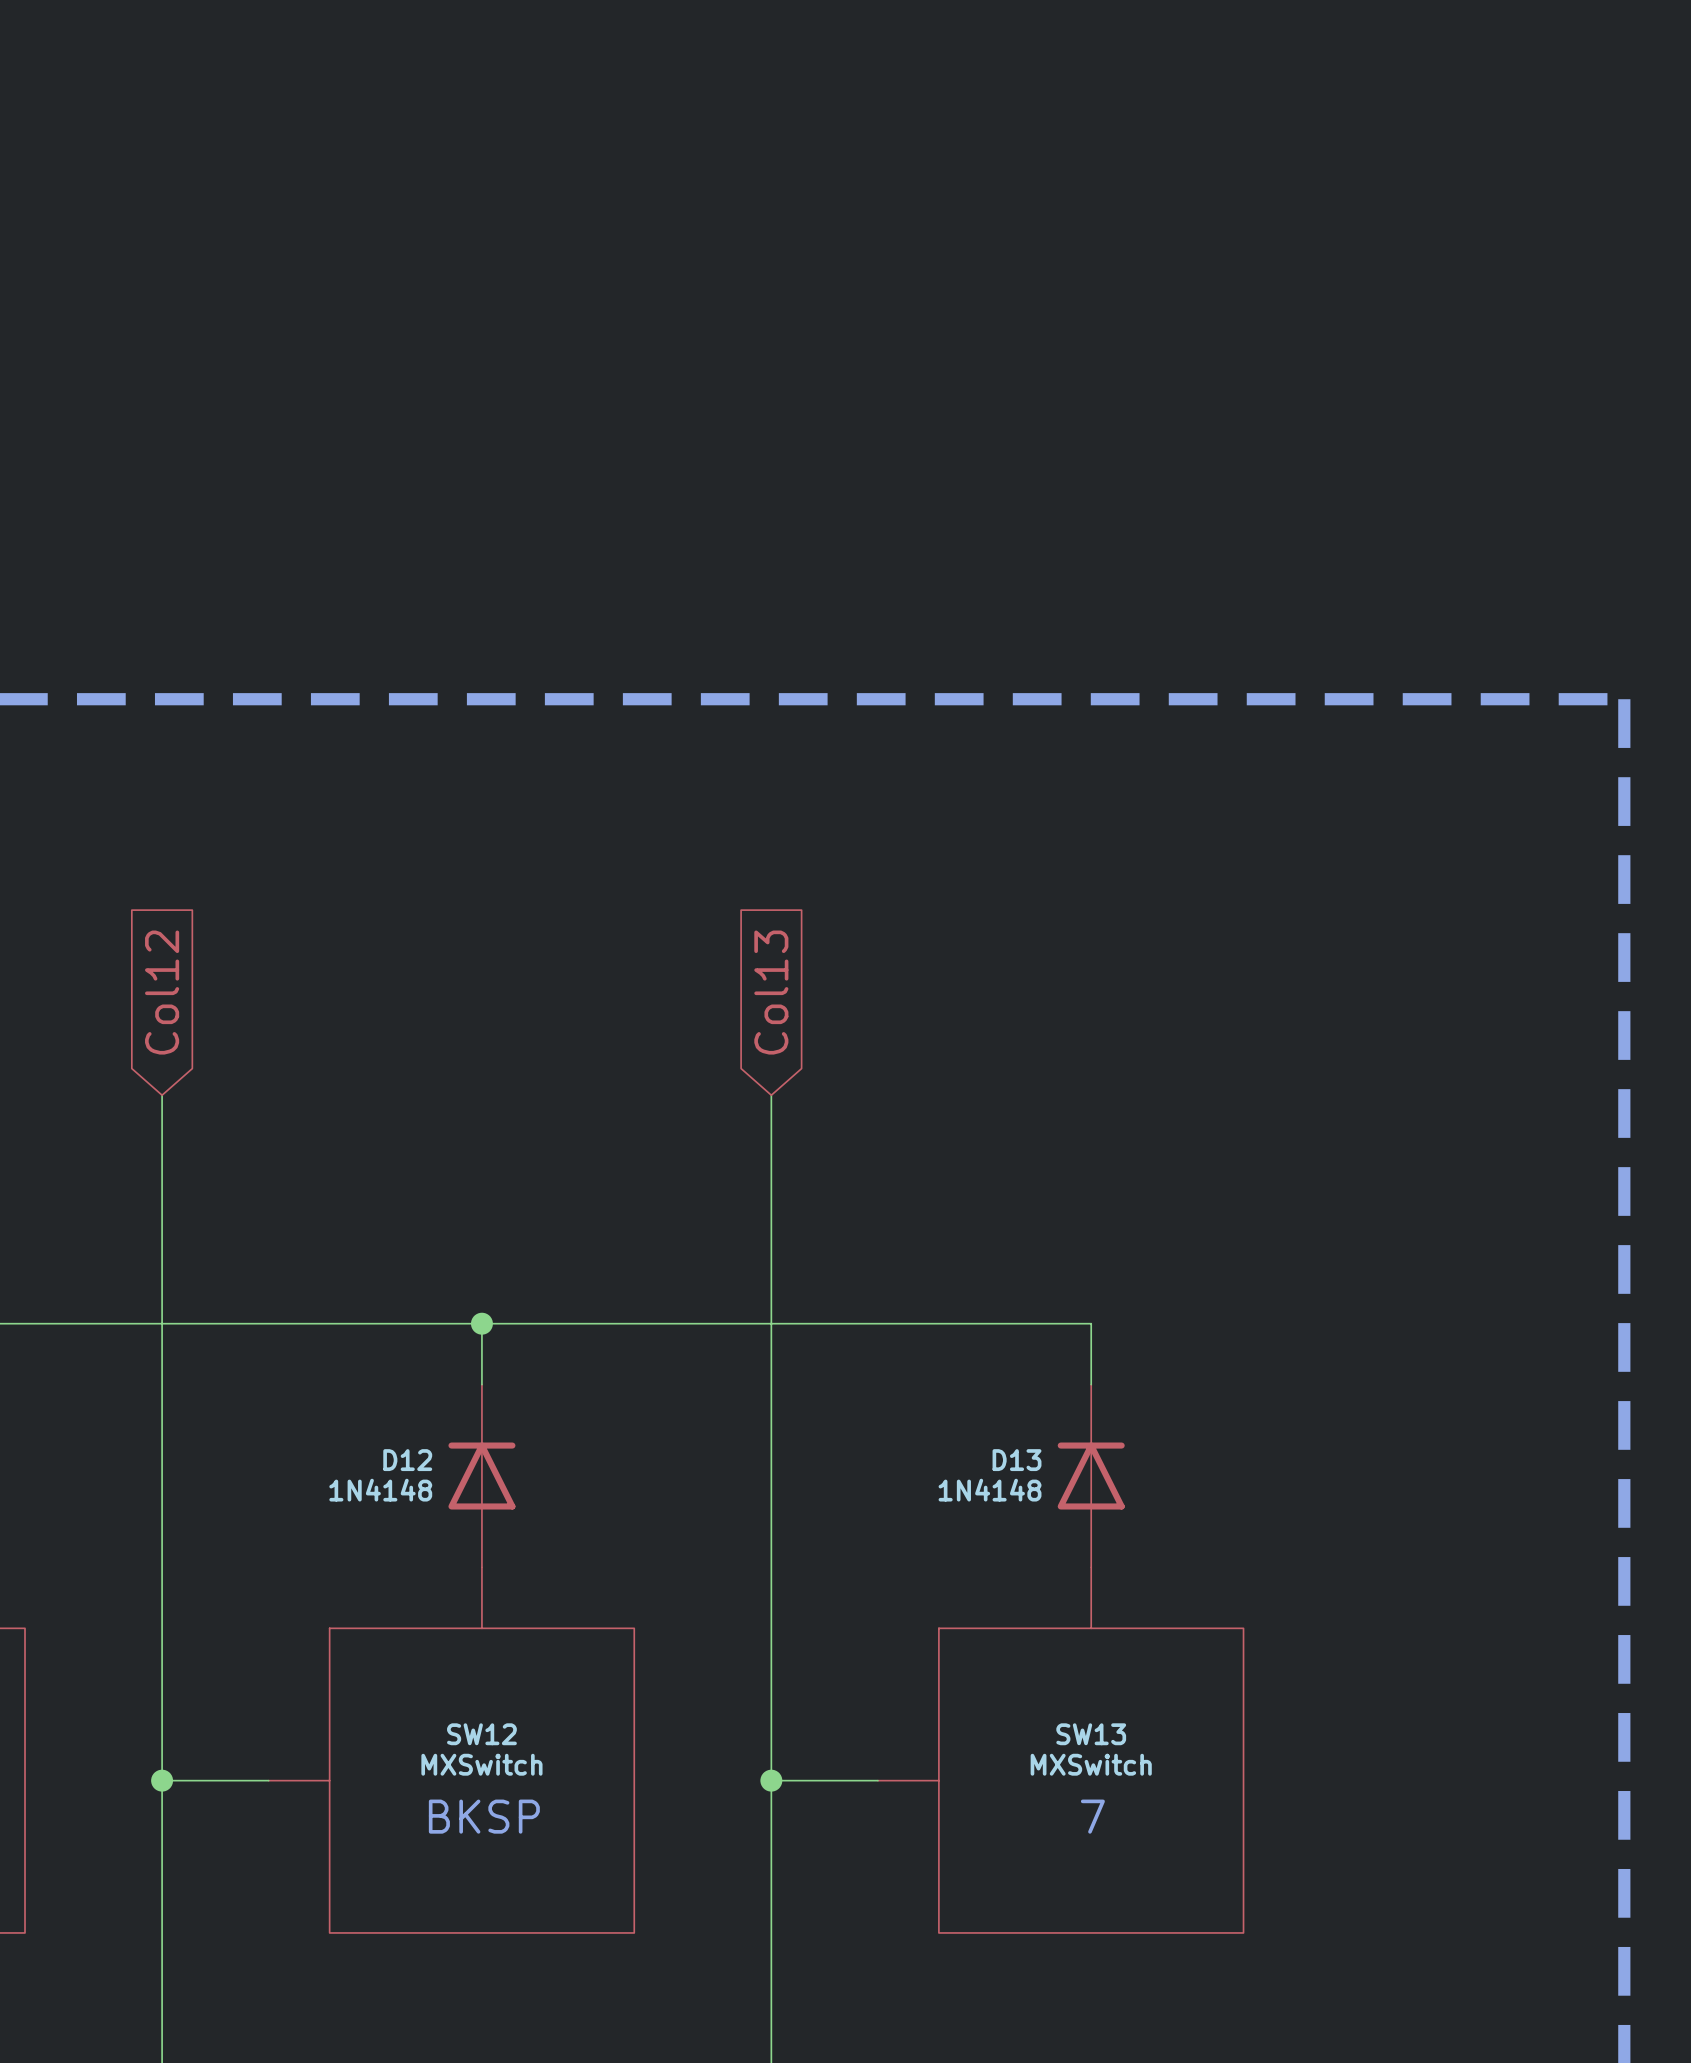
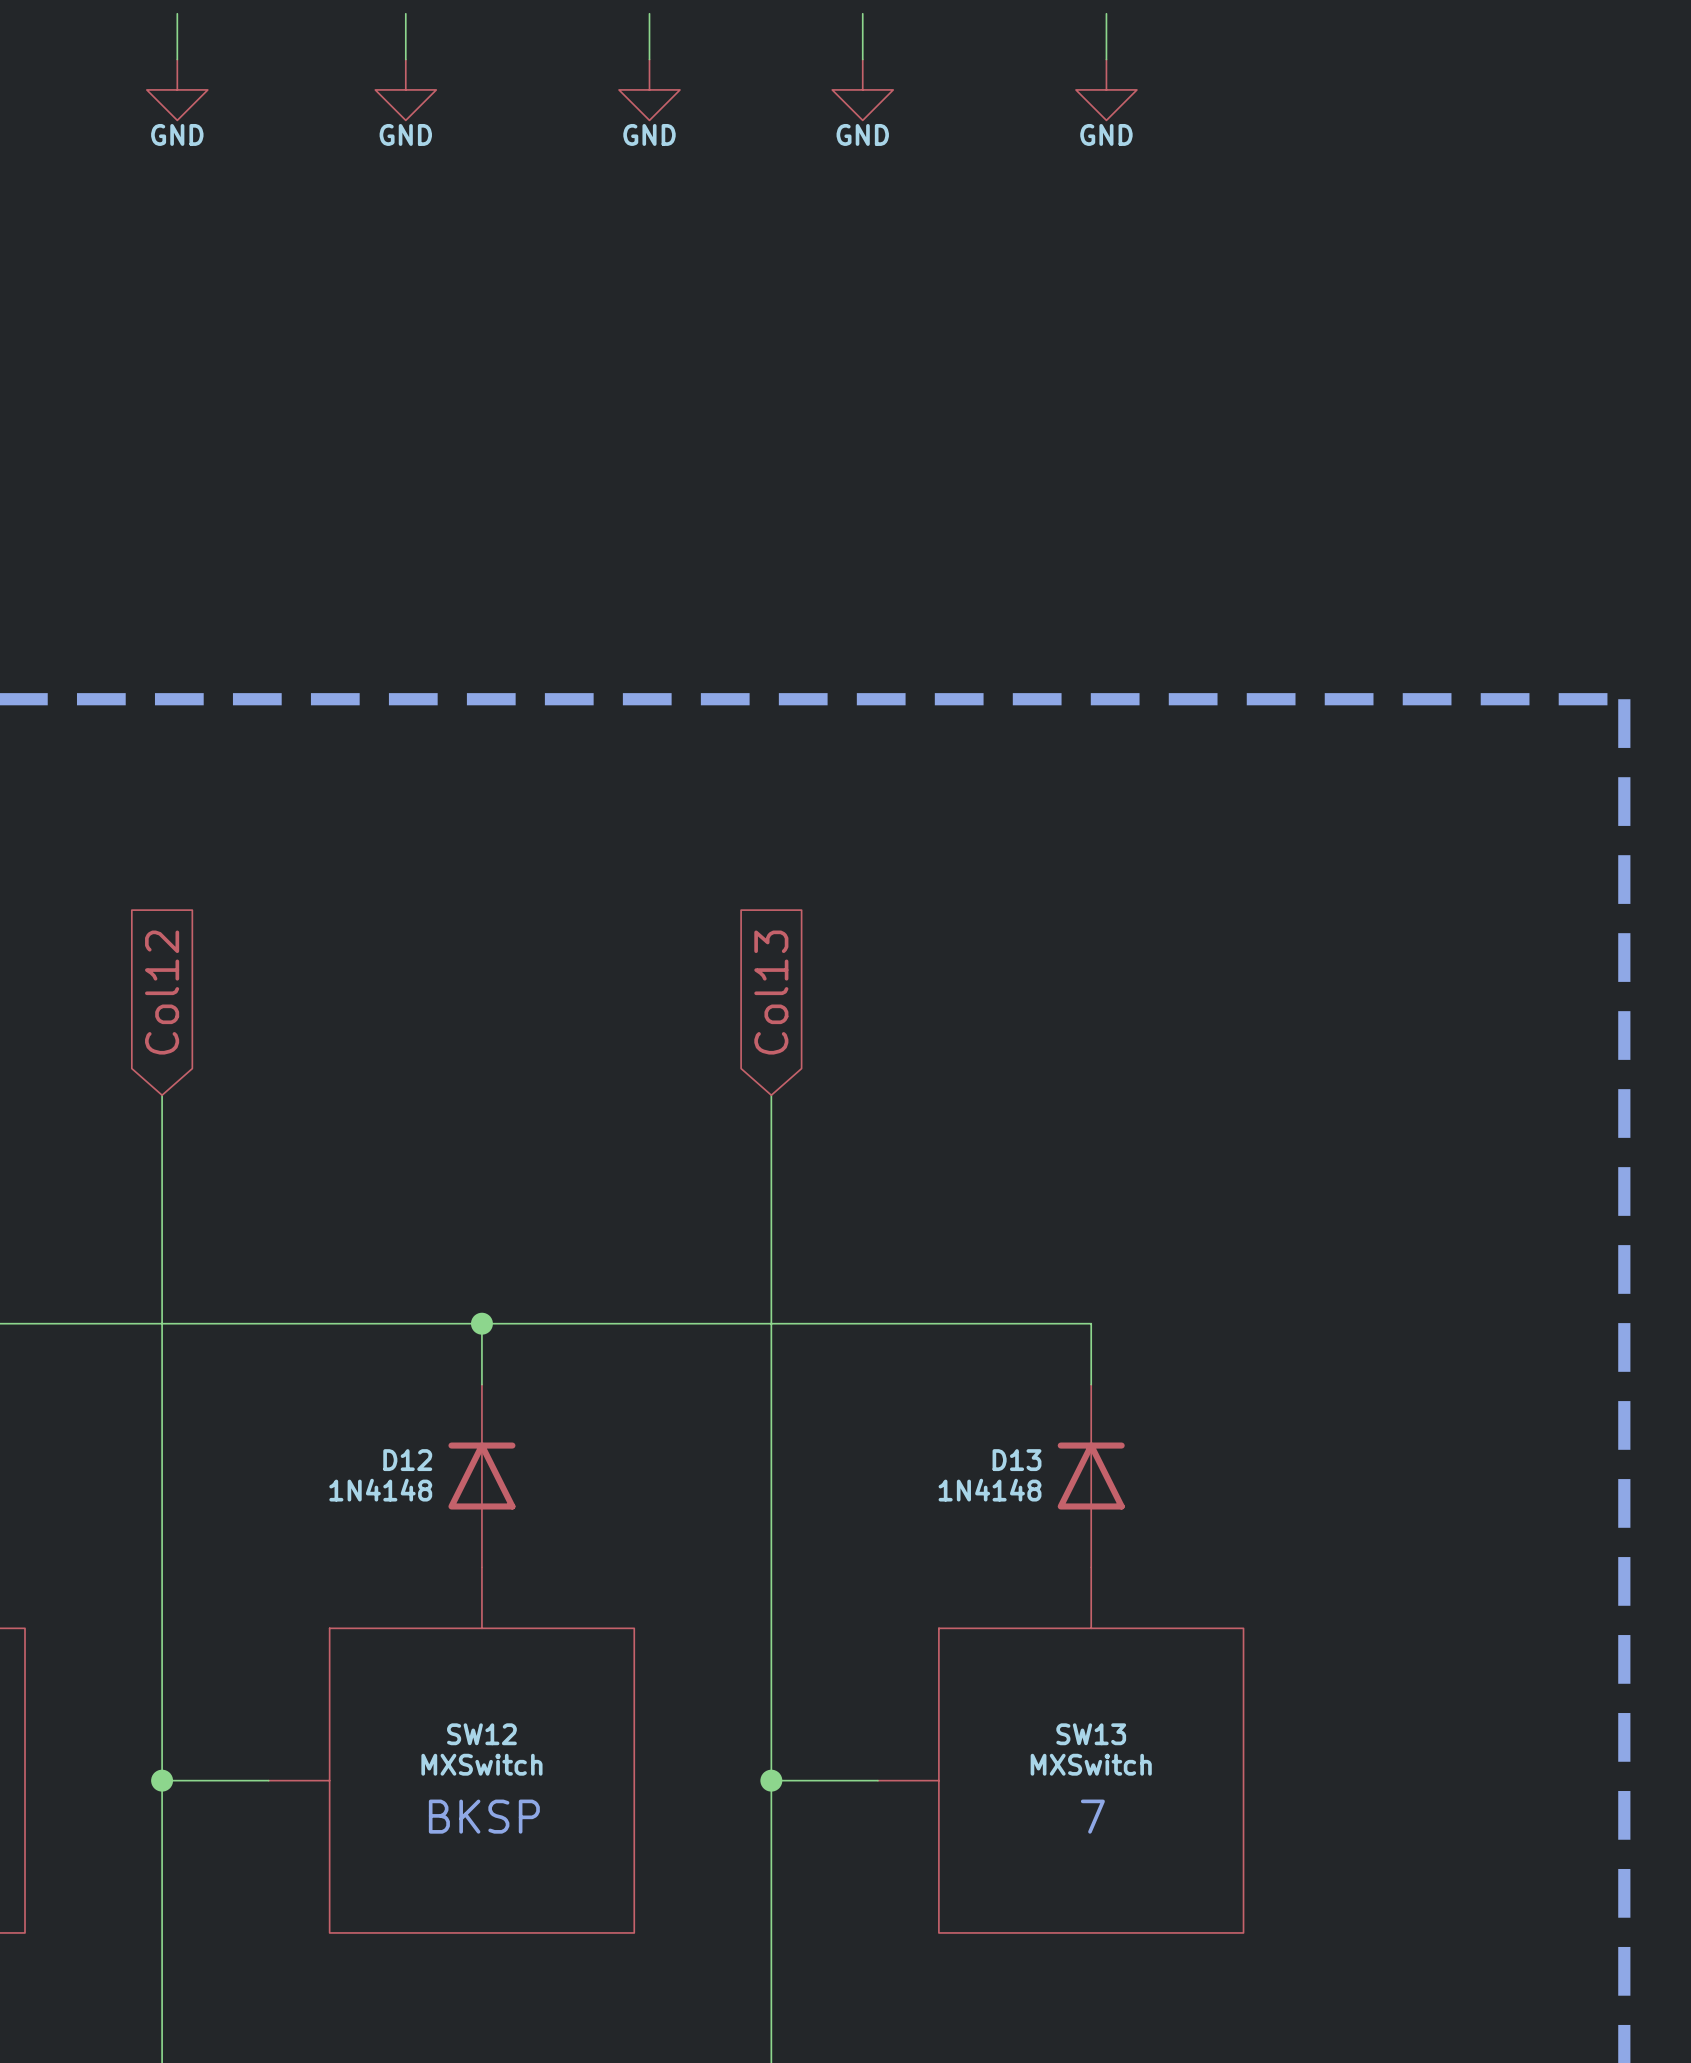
wire: none -> (177, 13) (177, 59)
wire: none -> (405, 13) (405, 59)
wire: none -> (649, 13) (649, 59)
wire: none -> (862, 13) (862, 59)
wire: none -> (1106, 13) (1106, 59)
power symbol: none -> GND (177, 89)
power symbol: none -> GND (405, 89)
power symbol: none -> GND (649, 89)
power symbol: none -> GND (862, 89)
power symbol: none -> GND (1106, 89)

